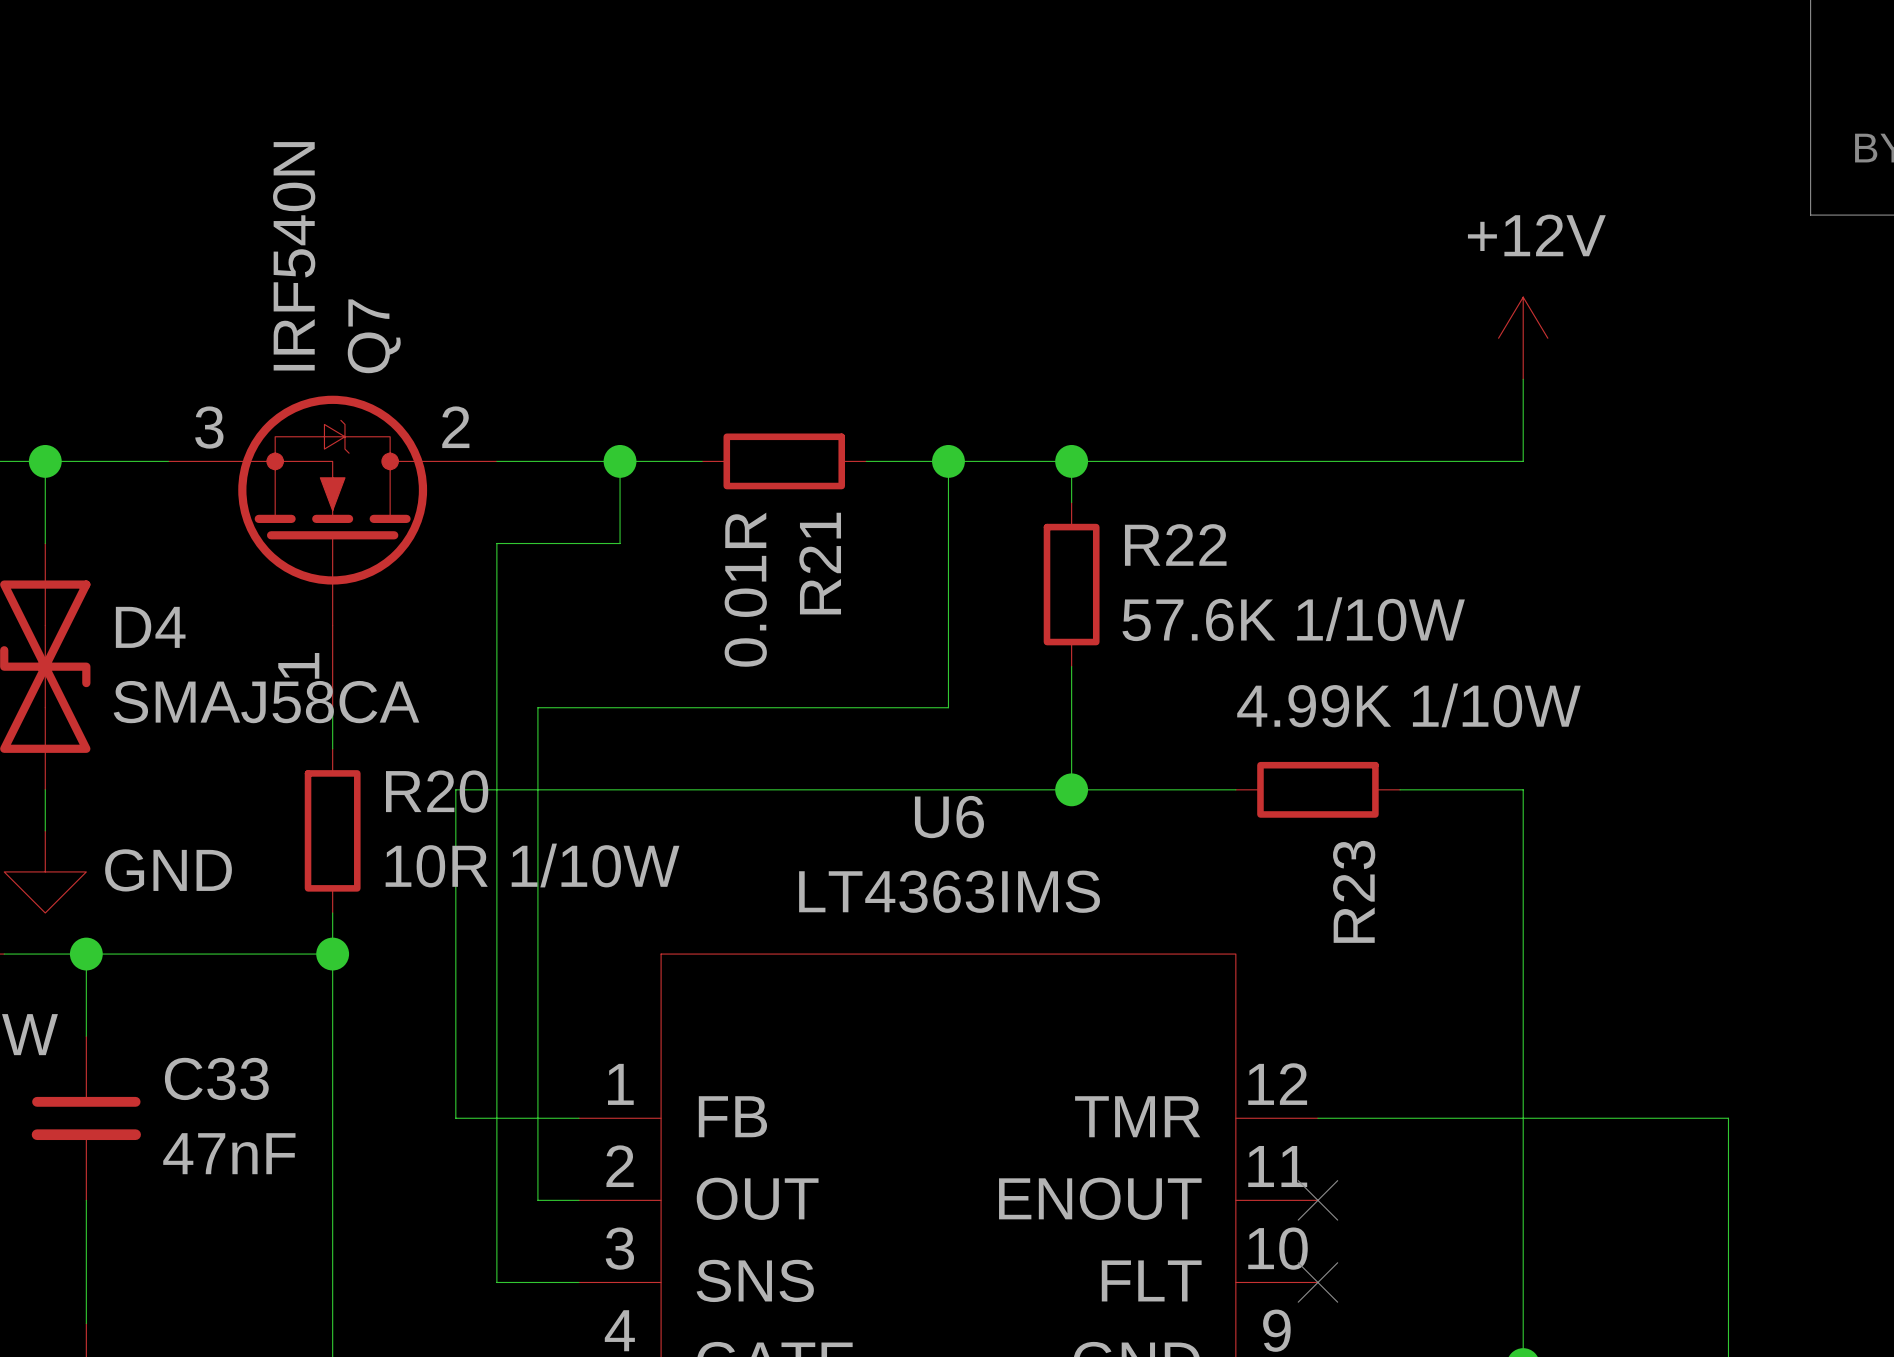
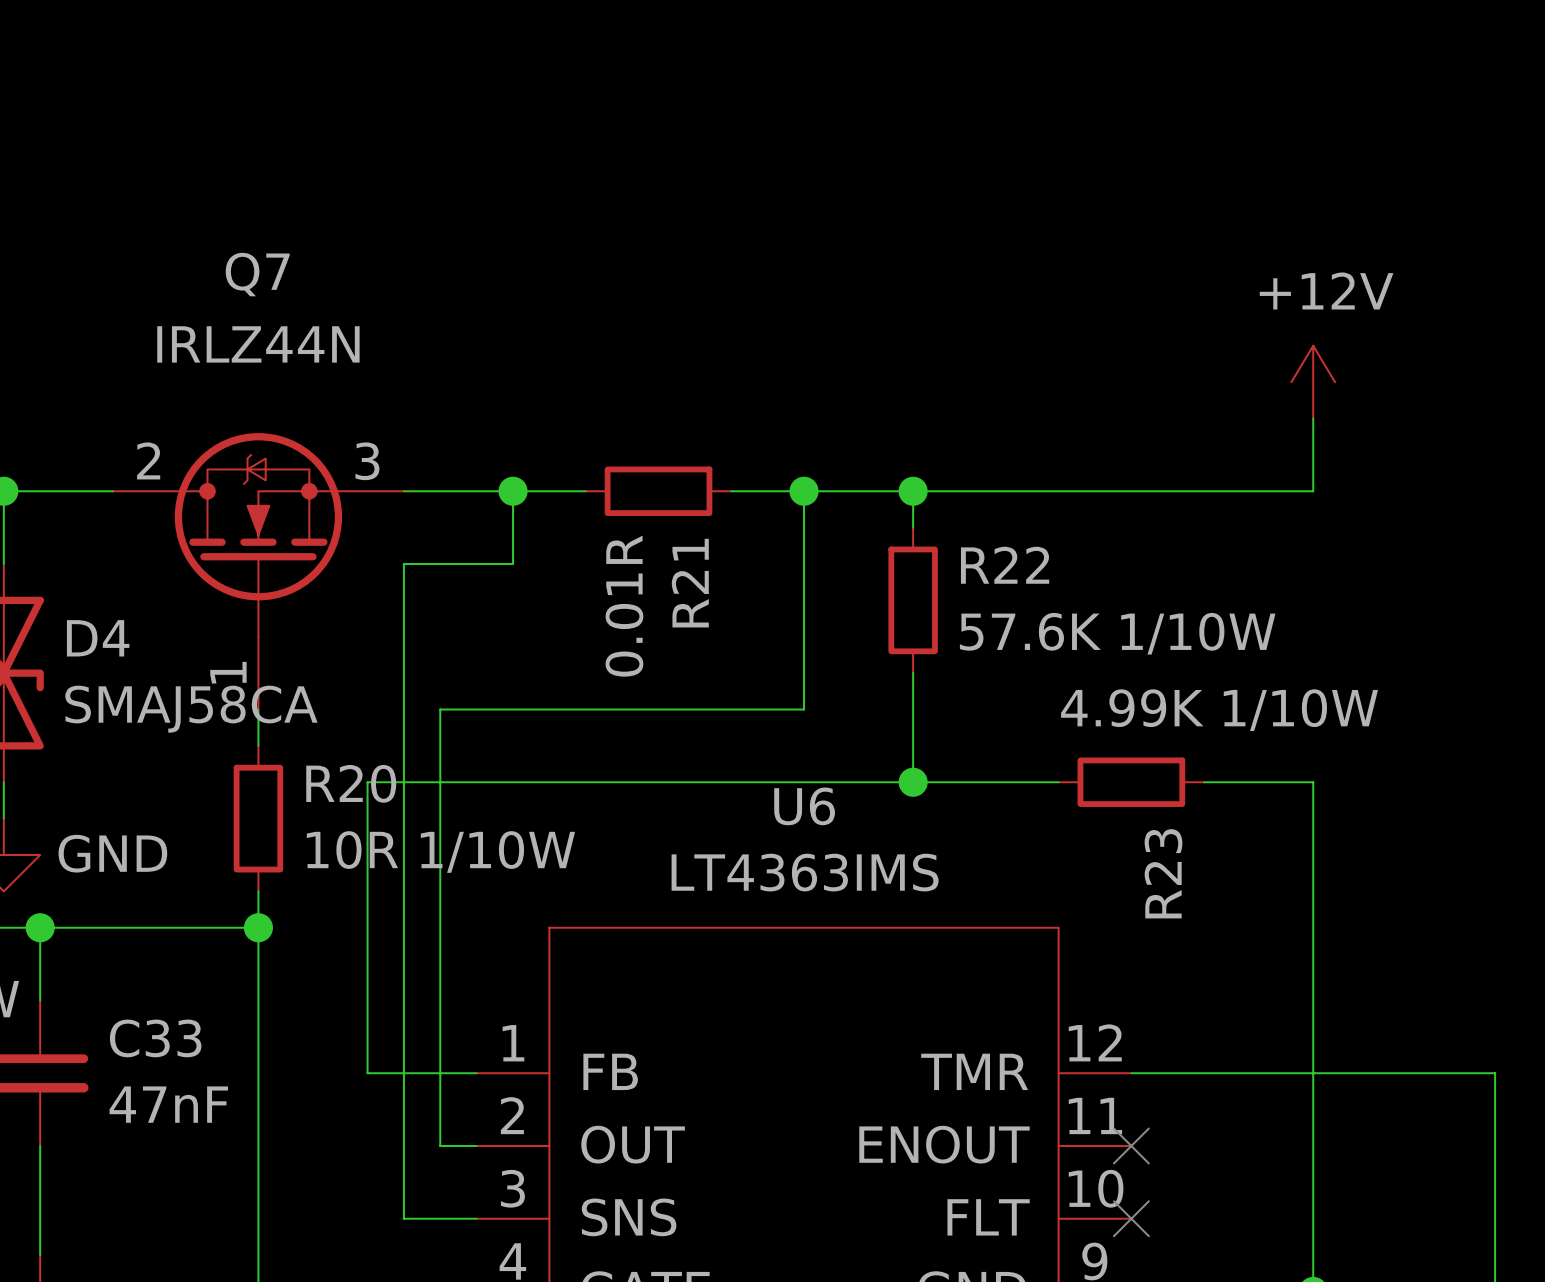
Q7 value: IRF540N (294, 256) -> IRLZ44N (258, 344)
Q7 name position: Q7 (374, 336) -> Q7 (257, 274)
Q7 flip: as is (332, 510) -> left-right (258, 534)

